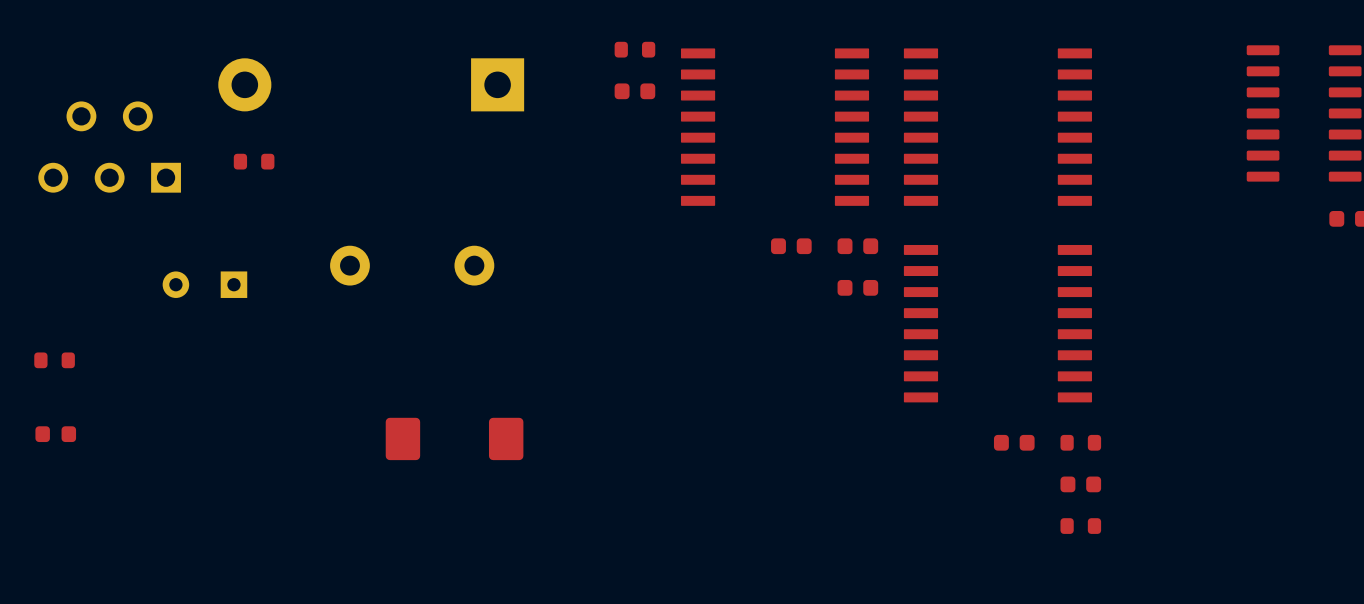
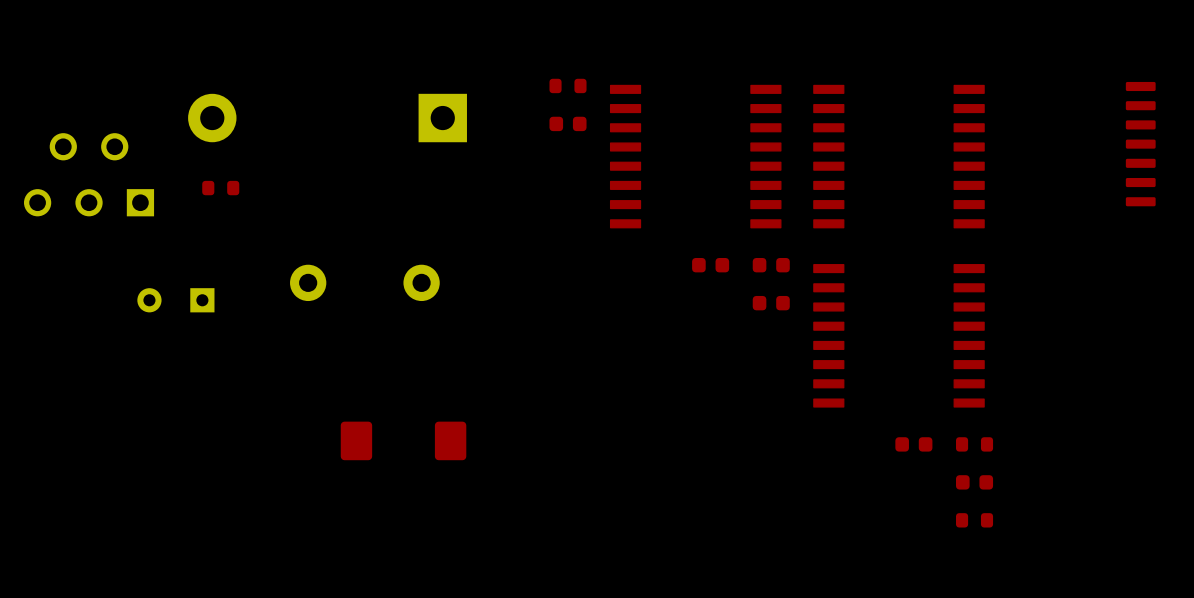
part: (54, 360) -> none
part: (55, 434) -> none

